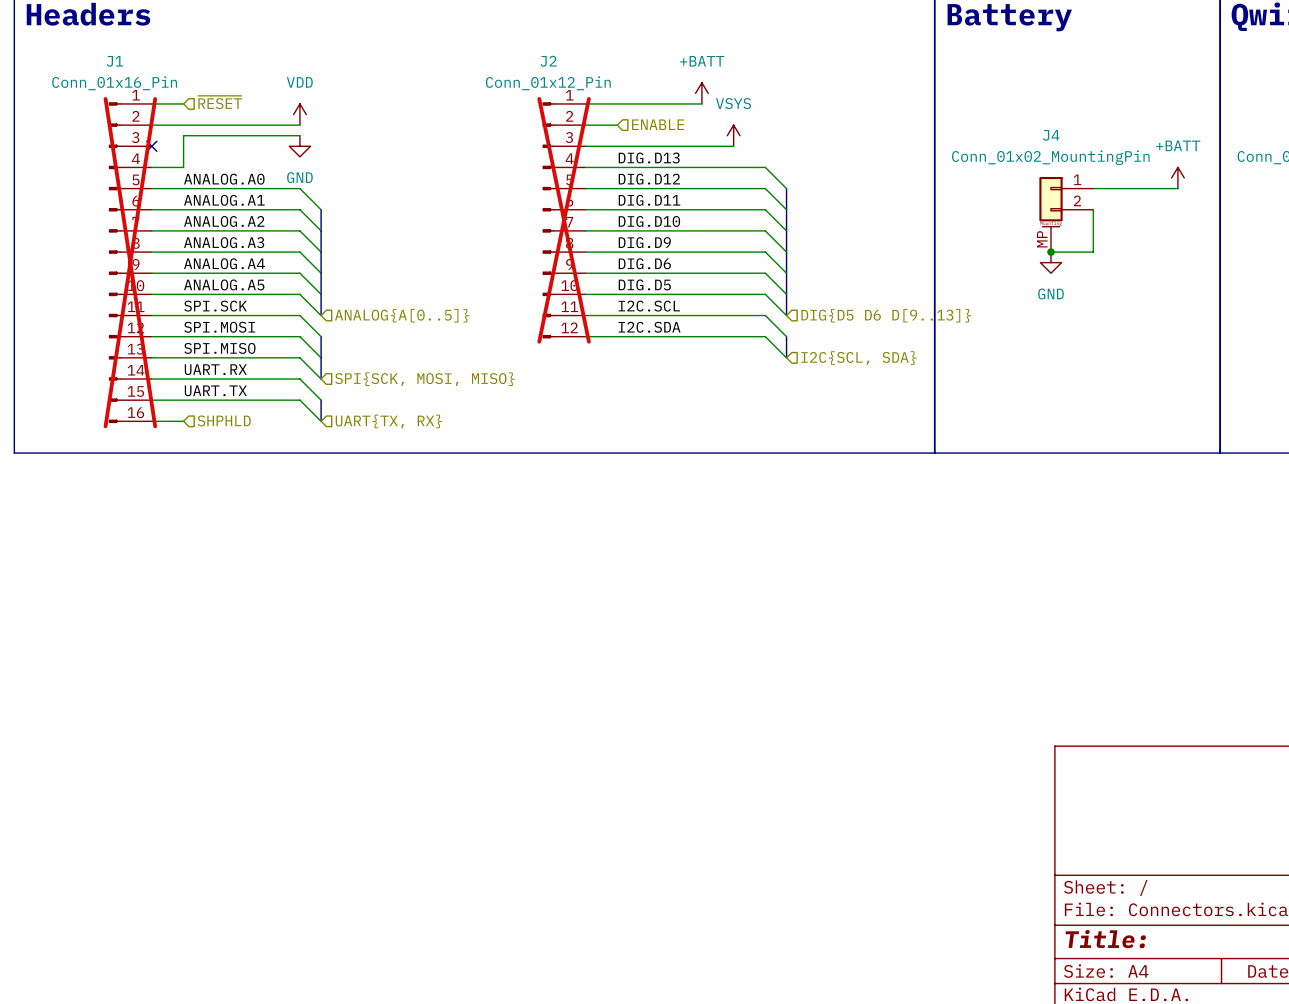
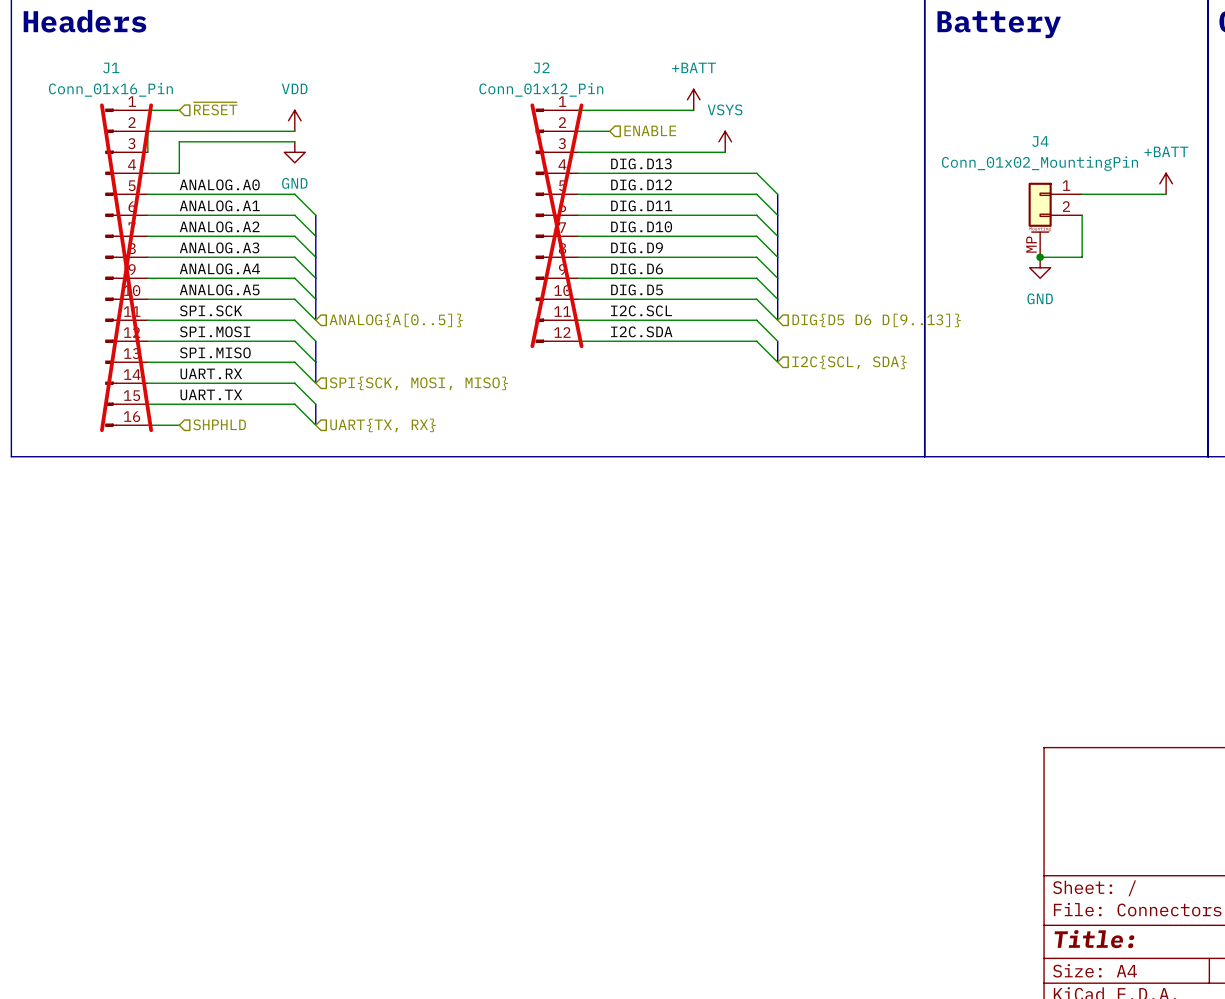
wire: none -> (147, 131) (147, 152)
no-connect mark: (151, 146) -> none

